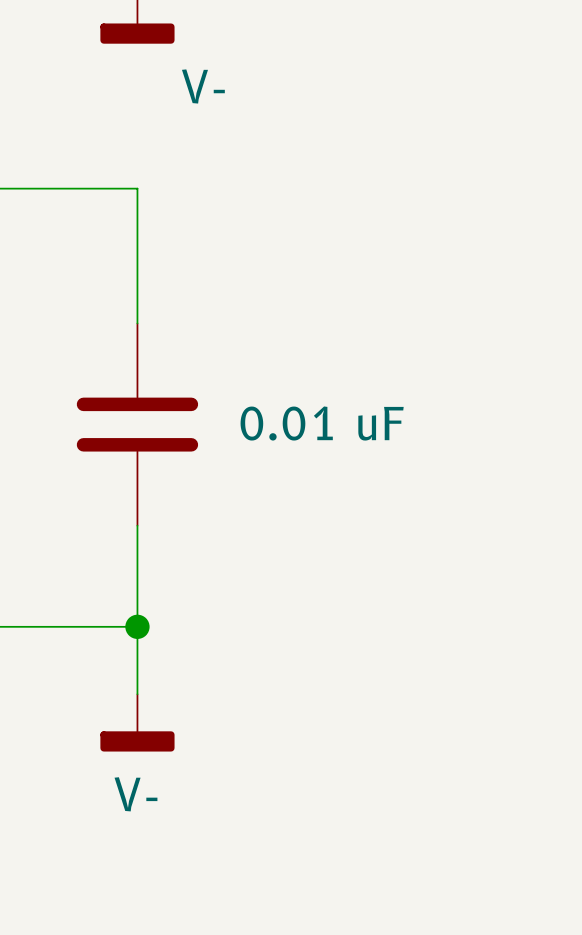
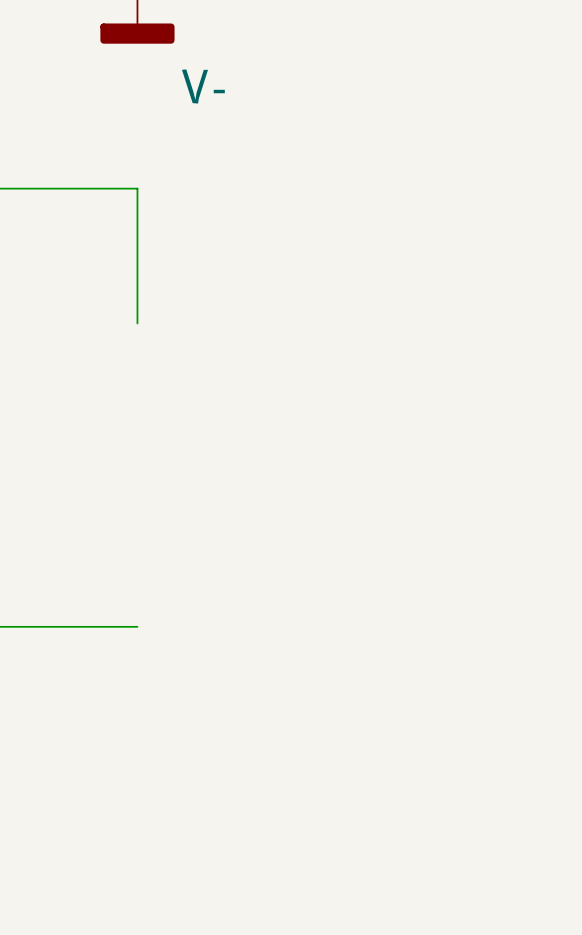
part: 0.01 uF (137, 424) -> none
wire: (137, 525) (137, 694) -> none
junction: (137, 626) -> none
power symbol: V- (137, 722) -> none

